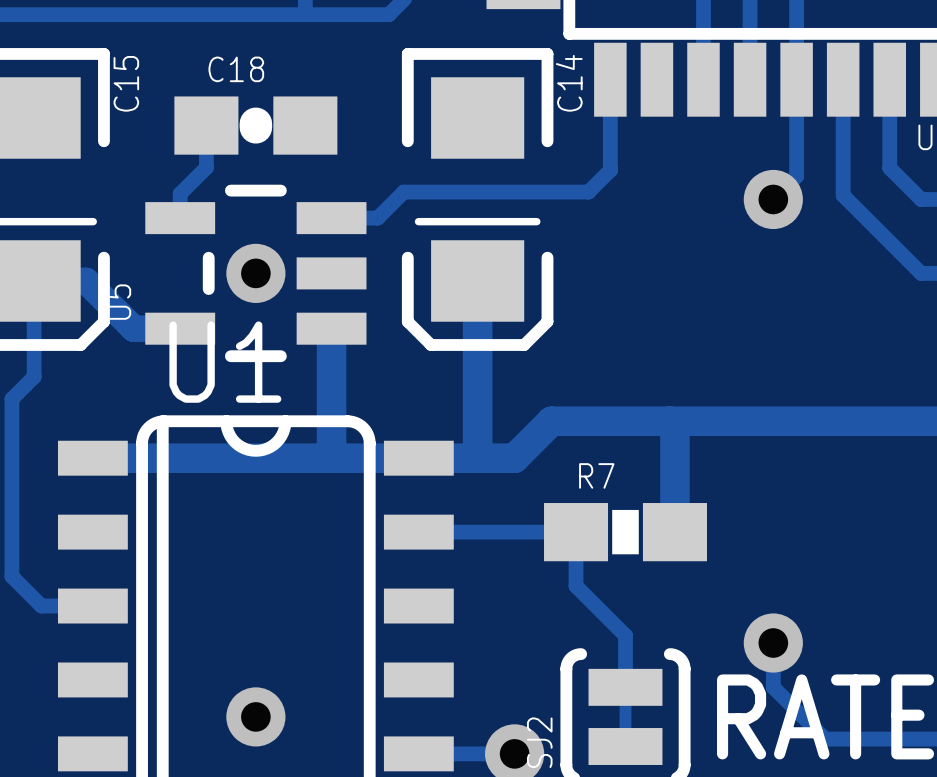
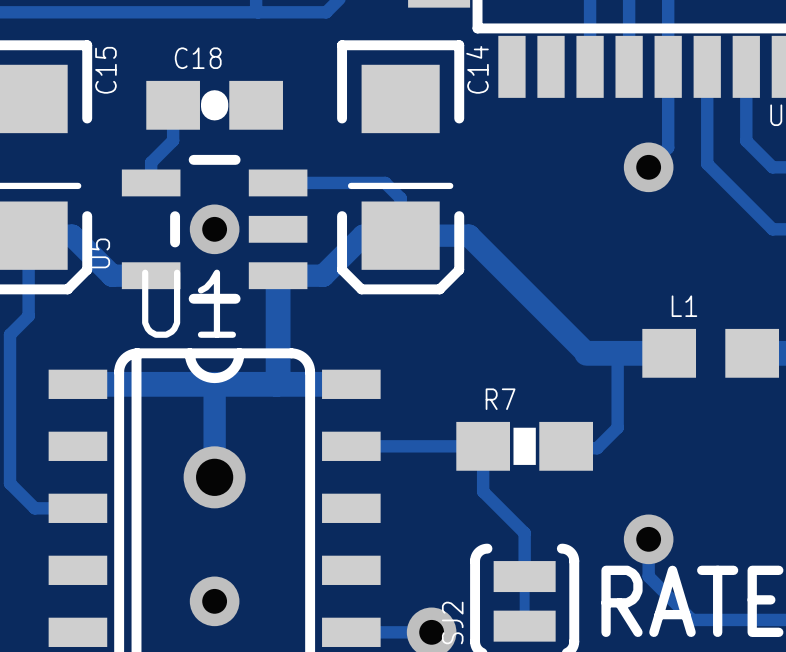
track: (610, 79) (610, 169) -> none
track: (610, 169) (588, 192) (403, 192) (377, 218) -> (400, 235) (400, 198) (385, 182) (316, 182)
track: (477, 280) (477, 458) -> none
track: (669, 421) (674, 426) (674, 532) -> (623, 353) (617, 359) (617, 427) (597, 448) (566, 448) (566, 446)
track: (699, 421) (551, 421) (514, 458) (418, 458) -> (586, 353) (468, 235) (363, 235) (323, 275) (278, 275)
track: (797, 421) (896, 421) -> none
L1: none -> (710, 353)
track: none -> (214, 384) (214, 477)
via: none -> (214, 477)

